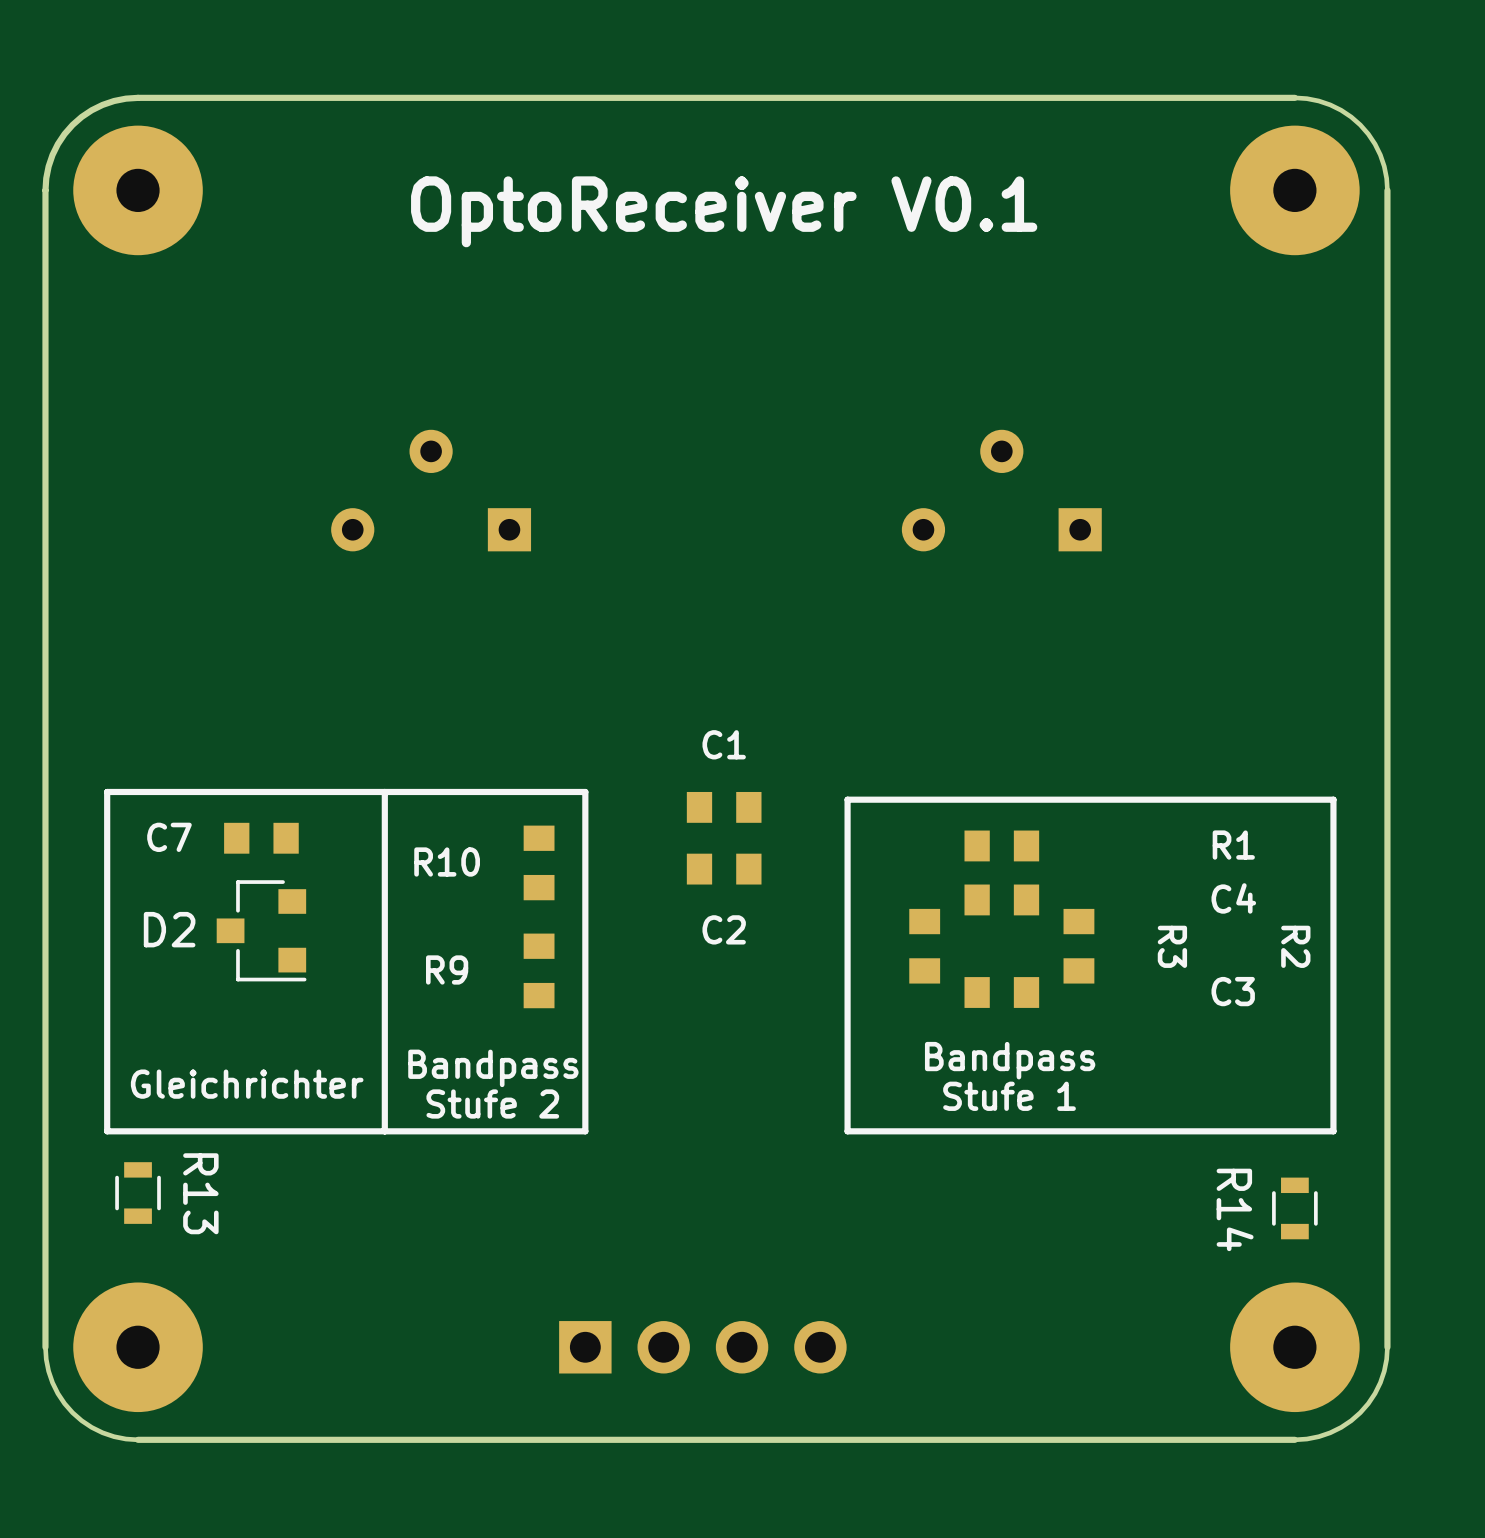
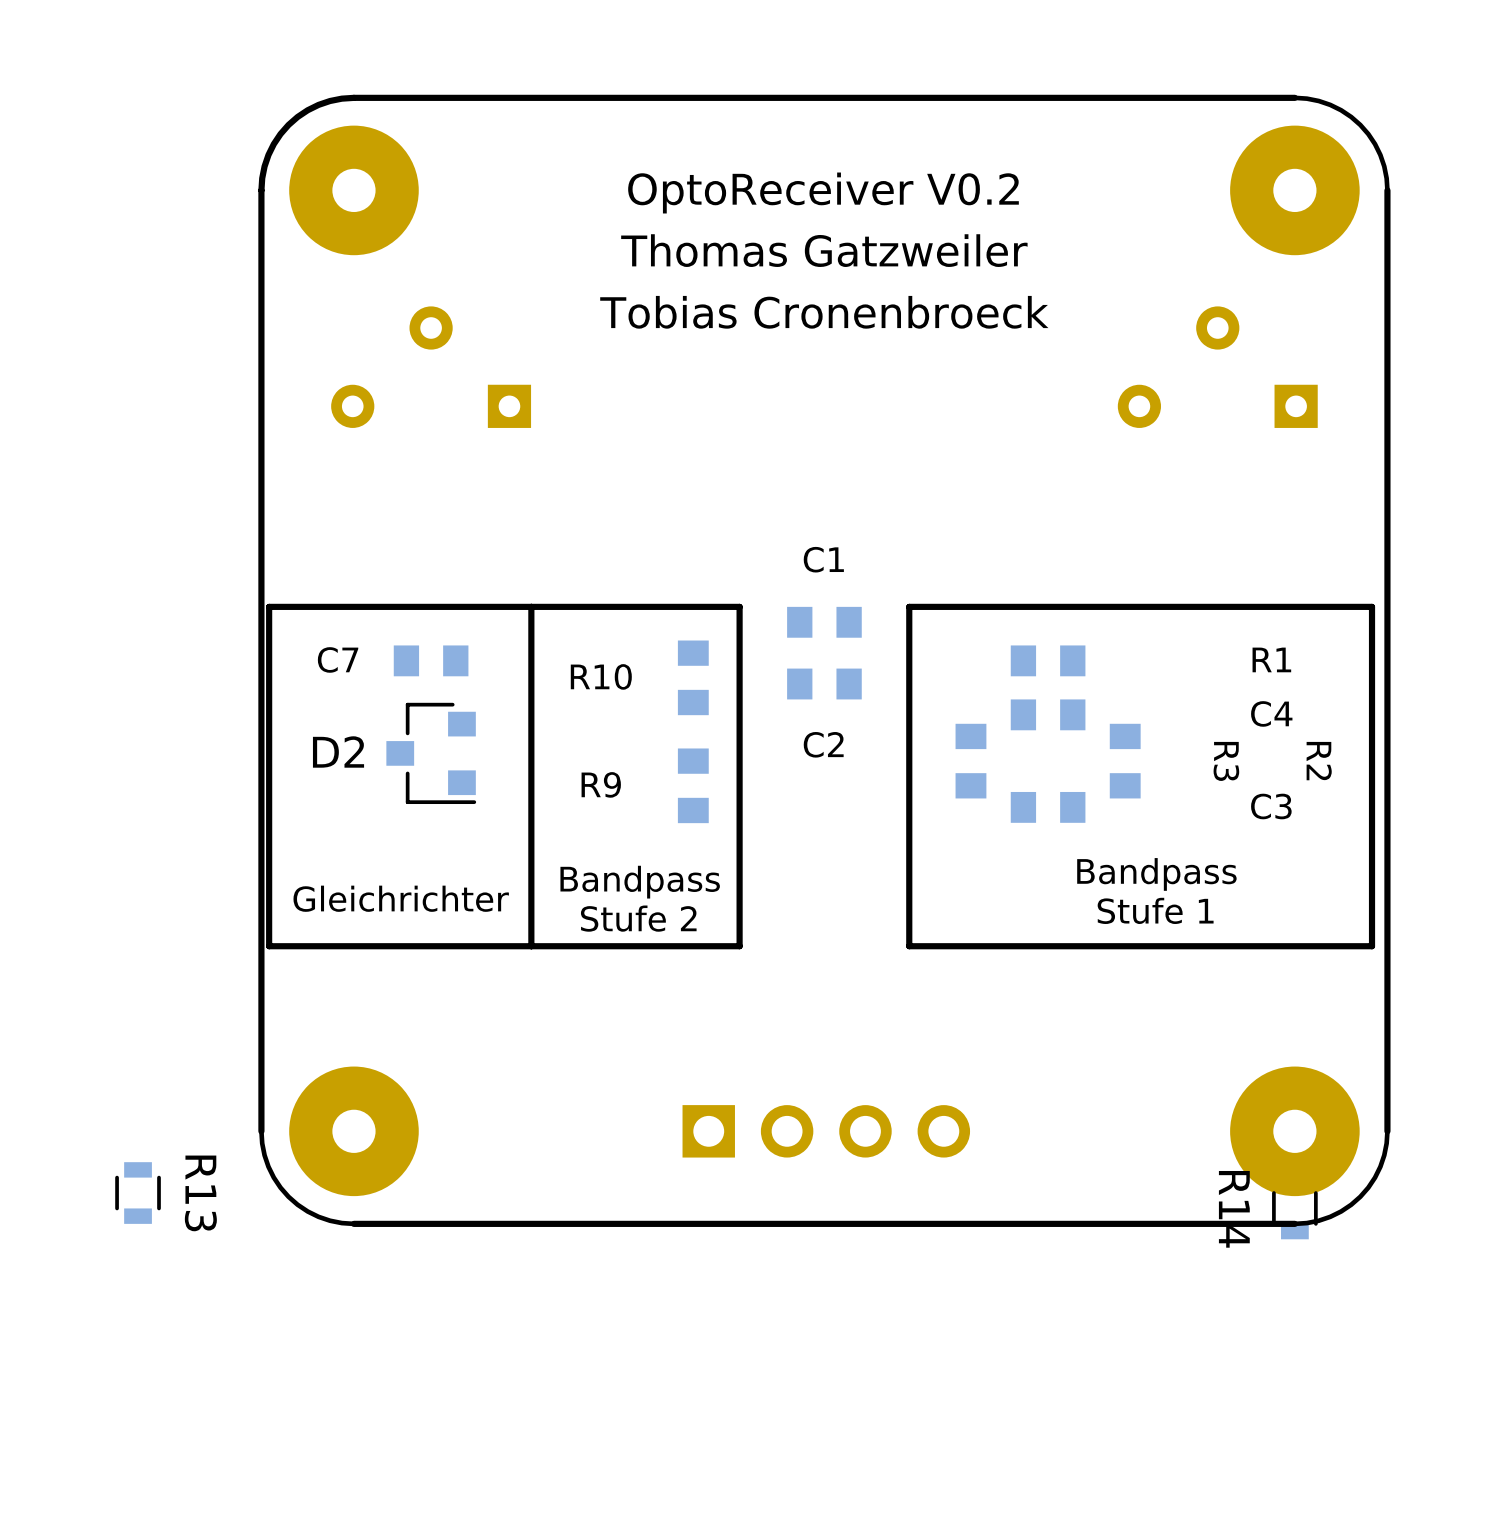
board edge: (353, 97) (138, 97) (114, 101) (91, 110) (72, 124) (57, 144) (48, 166) (45, 190) (45, 1347) (46, 1359) (52, 1382) (64, 1403) (72, 1412) (81, 1420) (102, 1432) (125, 1439) (138, 1439) (1294, 1439) (1318, 1436) (1341, 1427) (1360, 1412) (1375, 1393) (1384, 1371) (1387, 1347) (1387, 1131) -> (353, 97) (341, 98) (318, 104) (307, 110) (288, 124) (273, 144) (268, 154) (262, 178) (261, 190) (261, 1131) (262, 1143) (268, 1166) (273, 1177) (288, 1196) (307, 1211) (318, 1216) (341, 1223) (353, 1223) (1294, 1223) (1306, 1223) (1330, 1216) (1341, 1211) (1360, 1196) (1375, 1177) (1380, 1166) (1386, 1143) (1387, 1131)
part position: (138, 190) -> (353, 190)
text: OptoReceiver V0.1 (724, 211) -> OptoReceiver V0.2 (823, 193)
text: none -> Thomas Gatzweiler (824, 250)
text: none -> Tobias Cronenbroeck (824, 312)
part position: (431, 490) -> (431, 367)
part position: (1001, 490) -> (1217, 367)
line: none -> (739, 606) (269, 606) (269, 946) (739, 946) (739, 606)
line: none -> (1372, 606) (909, 606) (909, 946) (1372, 946) (1372, 606)
line: (384, 791) (384, 1131) -> (531, 606) (531, 946)
line: (585, 791) (107, 791) (107, 1131) (585, 1131) (585, 791) -> none
line: (1333, 799) (1333, 1131) (847, 1131) (847, 799) (1333, 799) -> none
C1 position: (724, 807) -> (824, 622)
C7 position: (261, 838) -> (431, 660)
R1 position: (1001, 845) -> (1048, 660)
R1 name position: R1 (1233, 845) -> R1 (1271, 659)
R10 position: (539, 862) -> (693, 677)
C2 position: (724, 869) -> (824, 684)
text: none -> Bandpass (1156, 874)
text: none -> Bandpass (640, 882)
C4 name position: C4 (1233, 898) -> C4 (1271, 713)
C4 position: (1001, 899) -> (1048, 714)
D2 position: (261, 930) -> (431, 753)
R3 position: (924, 946) -> (970, 761)
R2 position: (1078, 946) -> (1125, 761)
R3 name position: R3 (1172, 946) -> R3 (1226, 761)
R2 name position: R2 (1295, 946) -> R2 (1319, 761)
R9 position: (539, 970) -> (693, 785)
C3 name position: C3 (1233, 991) -> C3 (1271, 806)
C3 position: (1001, 992) -> (1048, 807)
text: Bandpass (1010, 1060) -> none
text: Bandpass (493, 1068) -> none
text position: Gleichrichter (247, 1084) -> Gleichrichter (401, 898)
text position: Stufe 1 (1009, 1096) -> Stufe 1 (1155, 910)
text position: Stufe 2 (492, 1103) -> Stufe 2 (638, 918)
part position: (138, 1347) -> (353, 1131)
part position: (702, 1347) -> (826, 1131)
part position: (1294, 1347) -> (1294, 1131)

